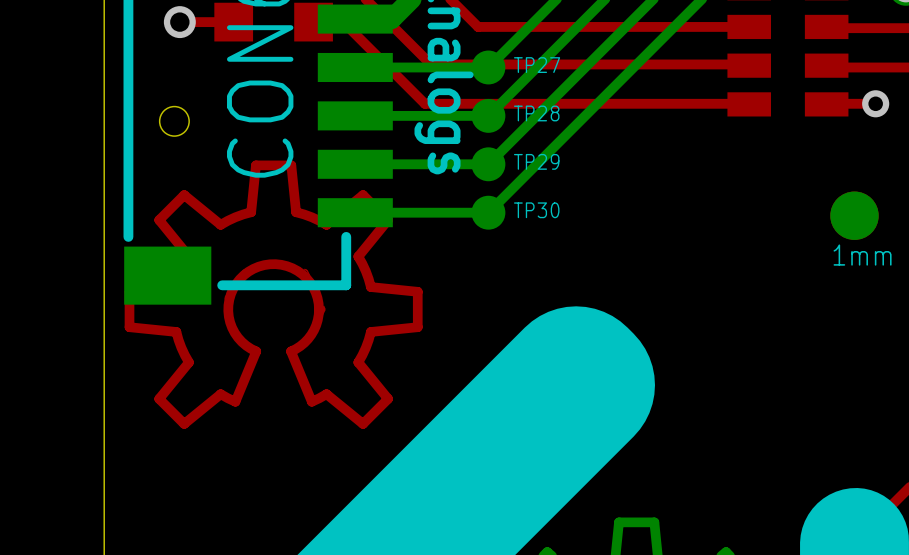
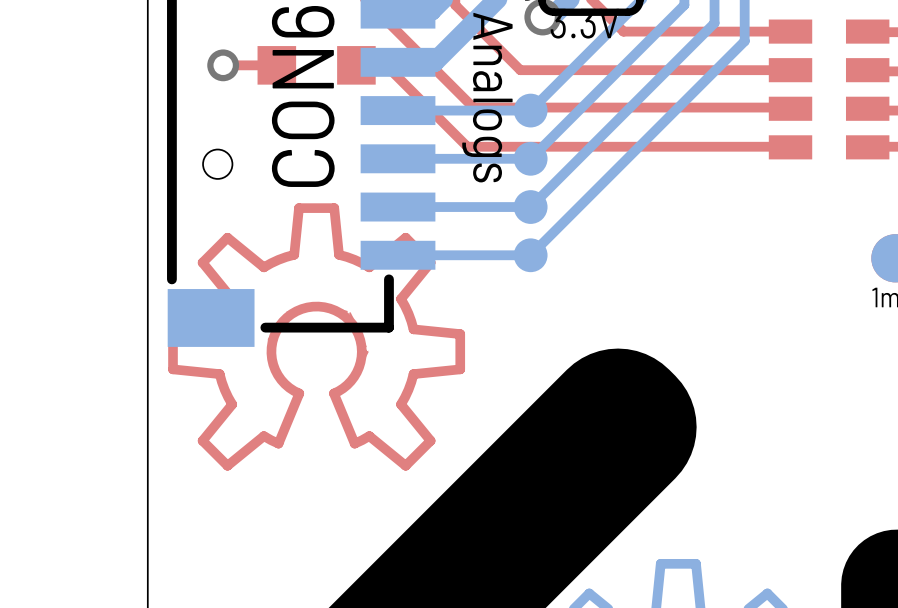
TP27 name: TP27 (537, 65) -> none
TP28 name: TP28 (536, 113) -> none
TP29 name: TP29 (536, 161) -> none
TP30 name: TP30 (536, 210) -> none

